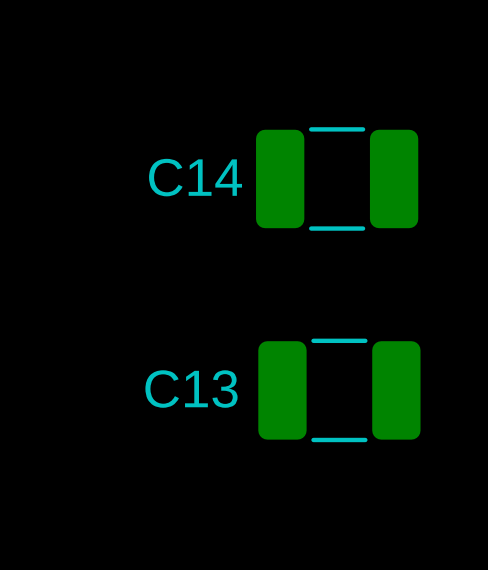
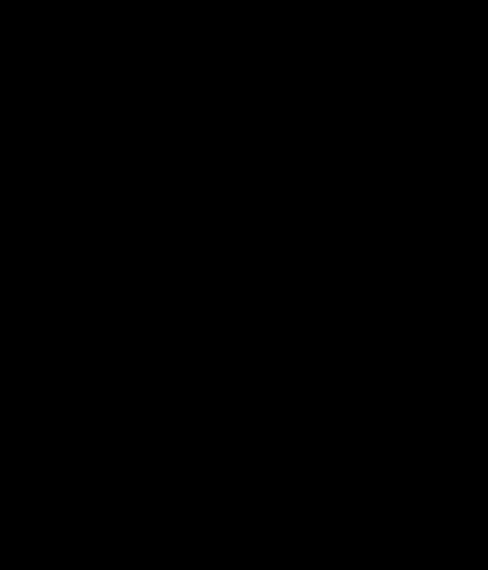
C14: (337, 178) -> none
C13: (339, 390) -> none

